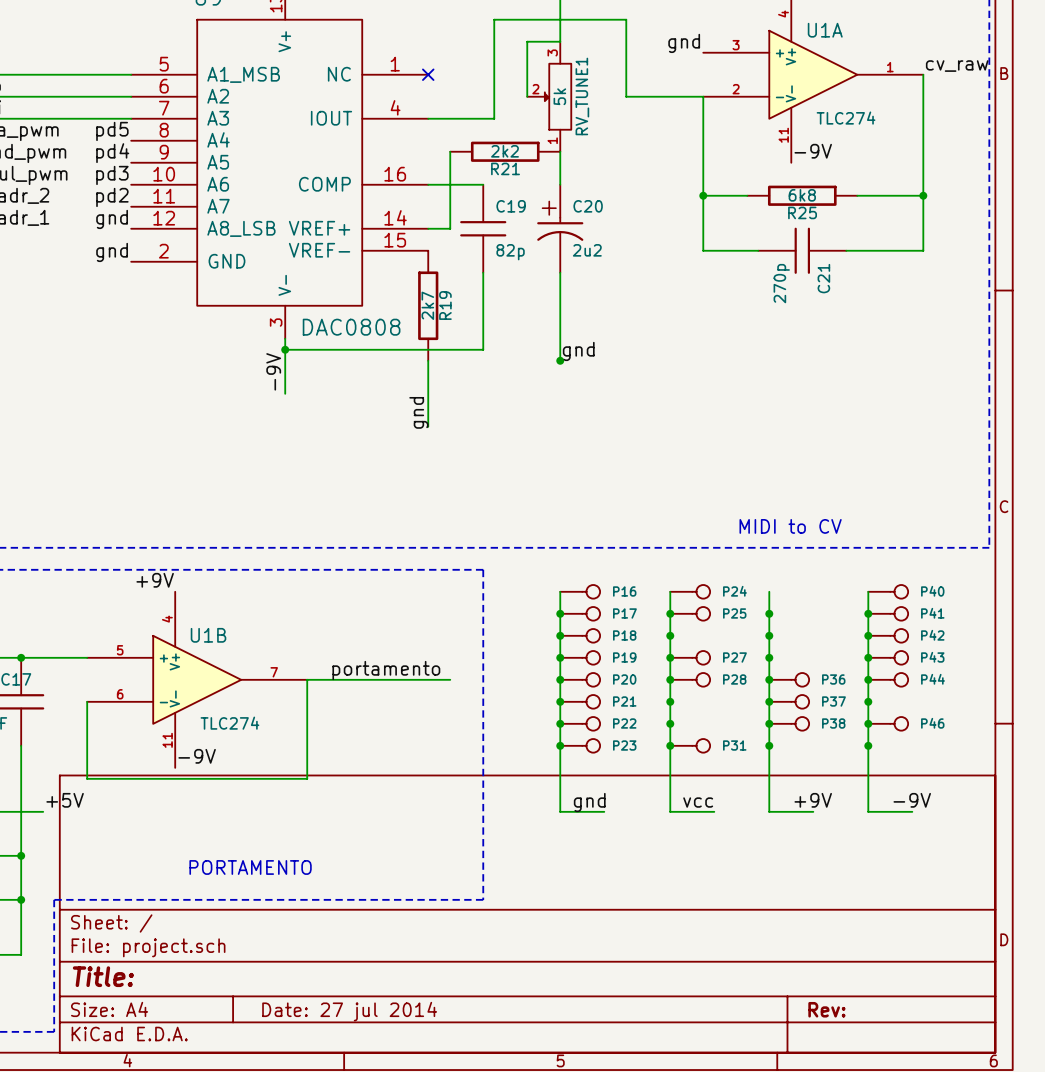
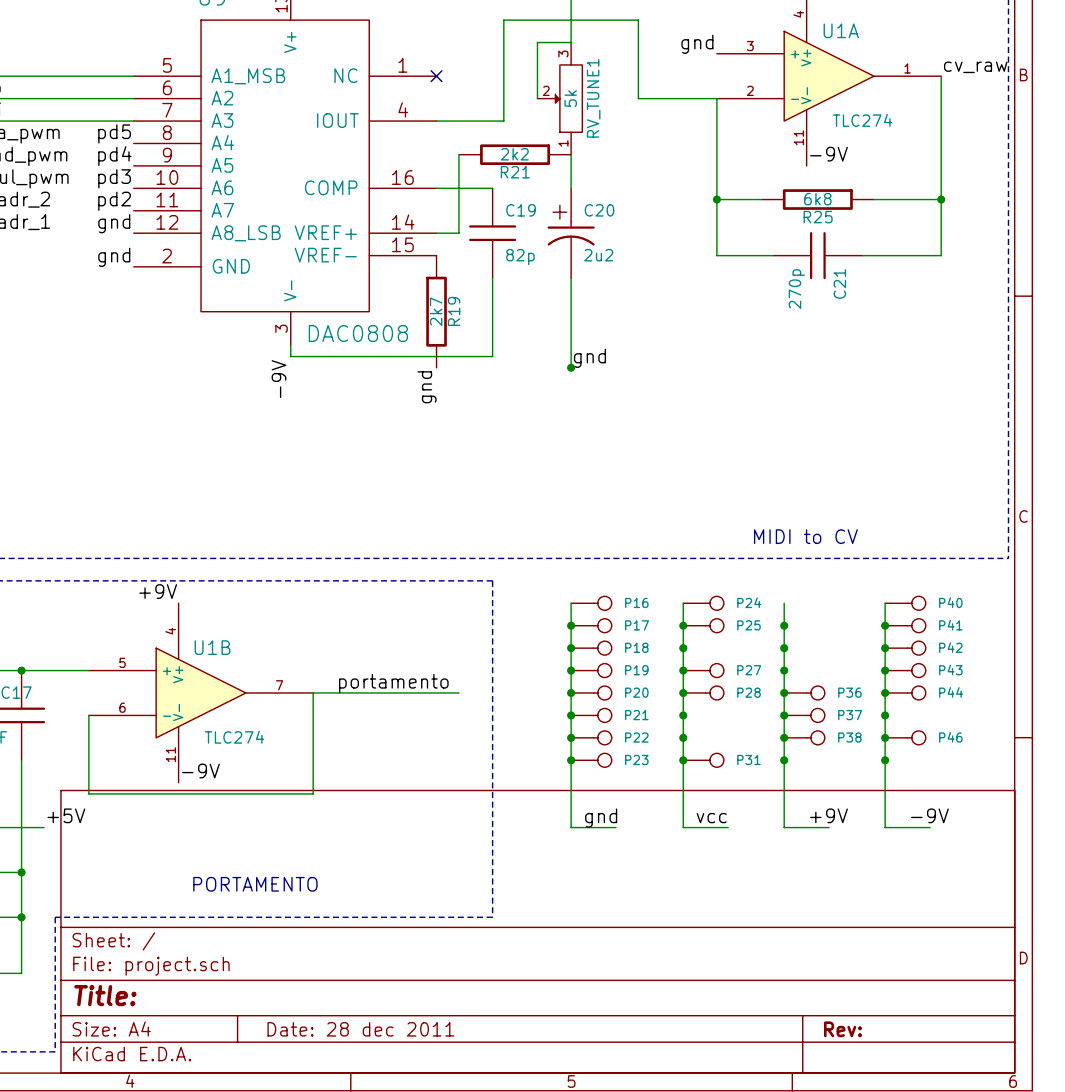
wire: (285, 349) (285, 393) -> none
junction: (285, 349) -> none
wire: (428, 360) (428, 426) -> none
label position: gnd (418, 412) -> gnd (427, 387)
title block: Date: 27 jul 2014 (349, 1011) -> Date: 28 dec 2011 (360, 1029)

